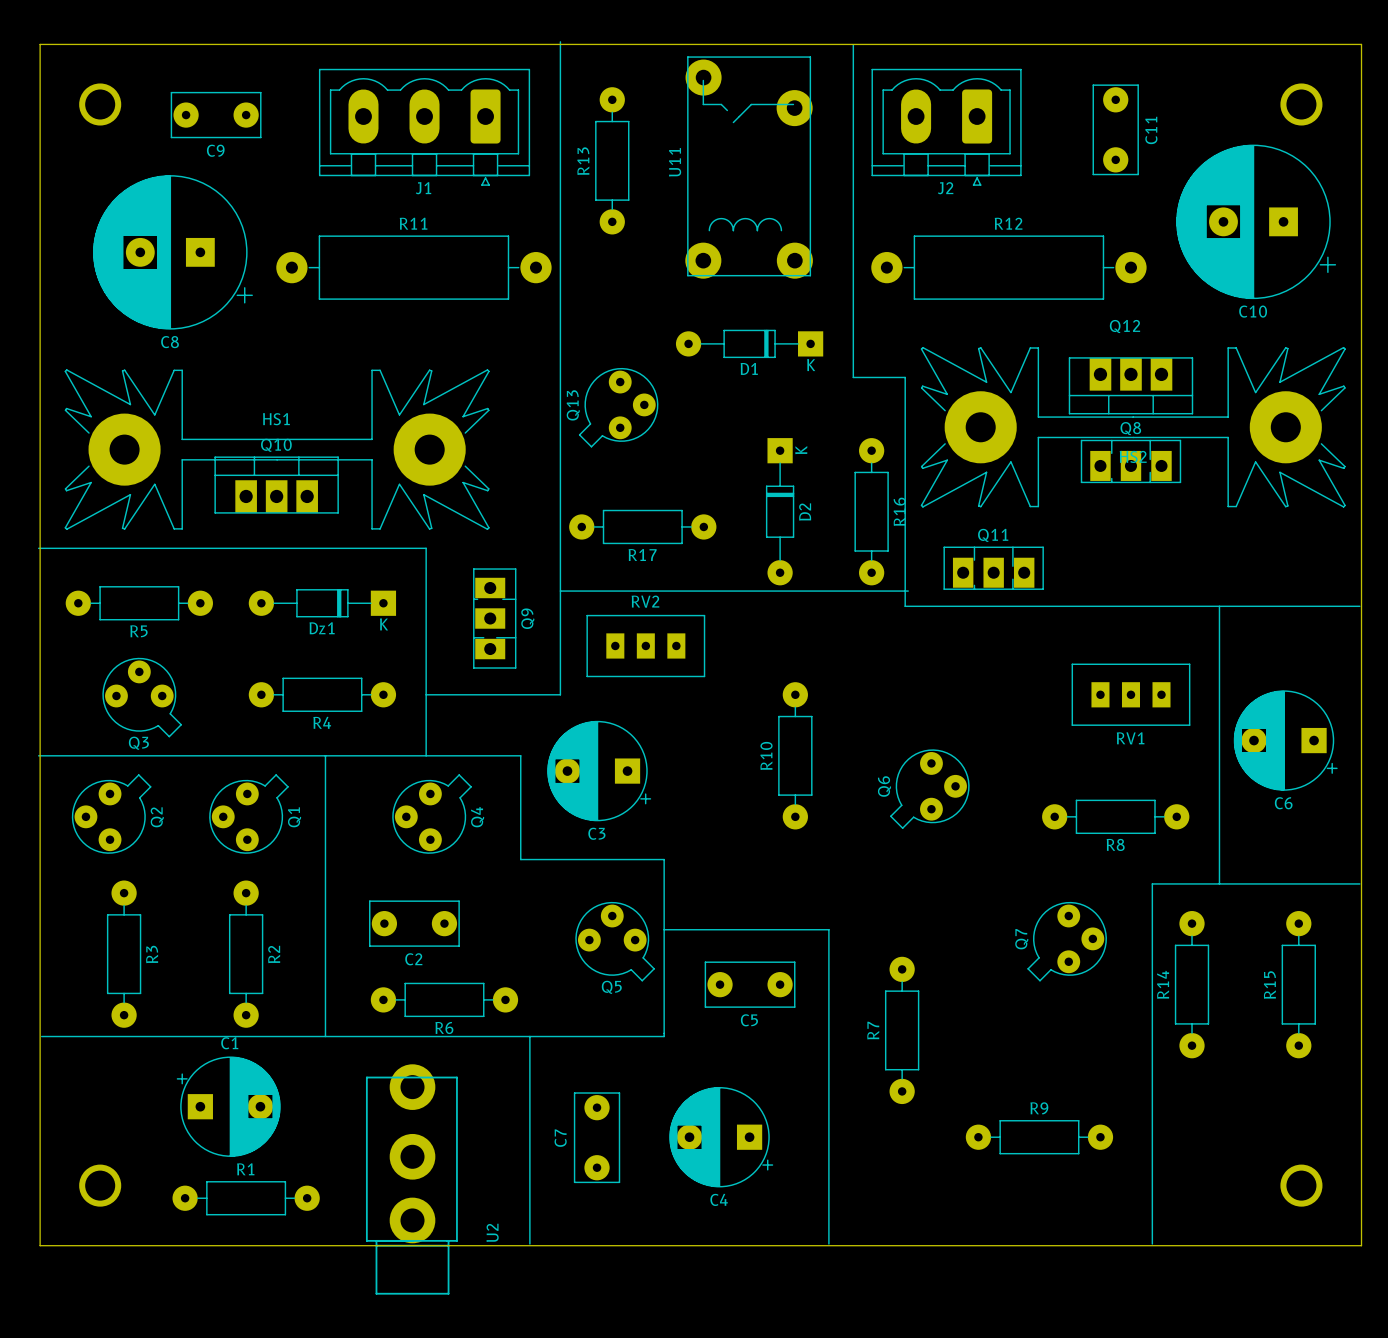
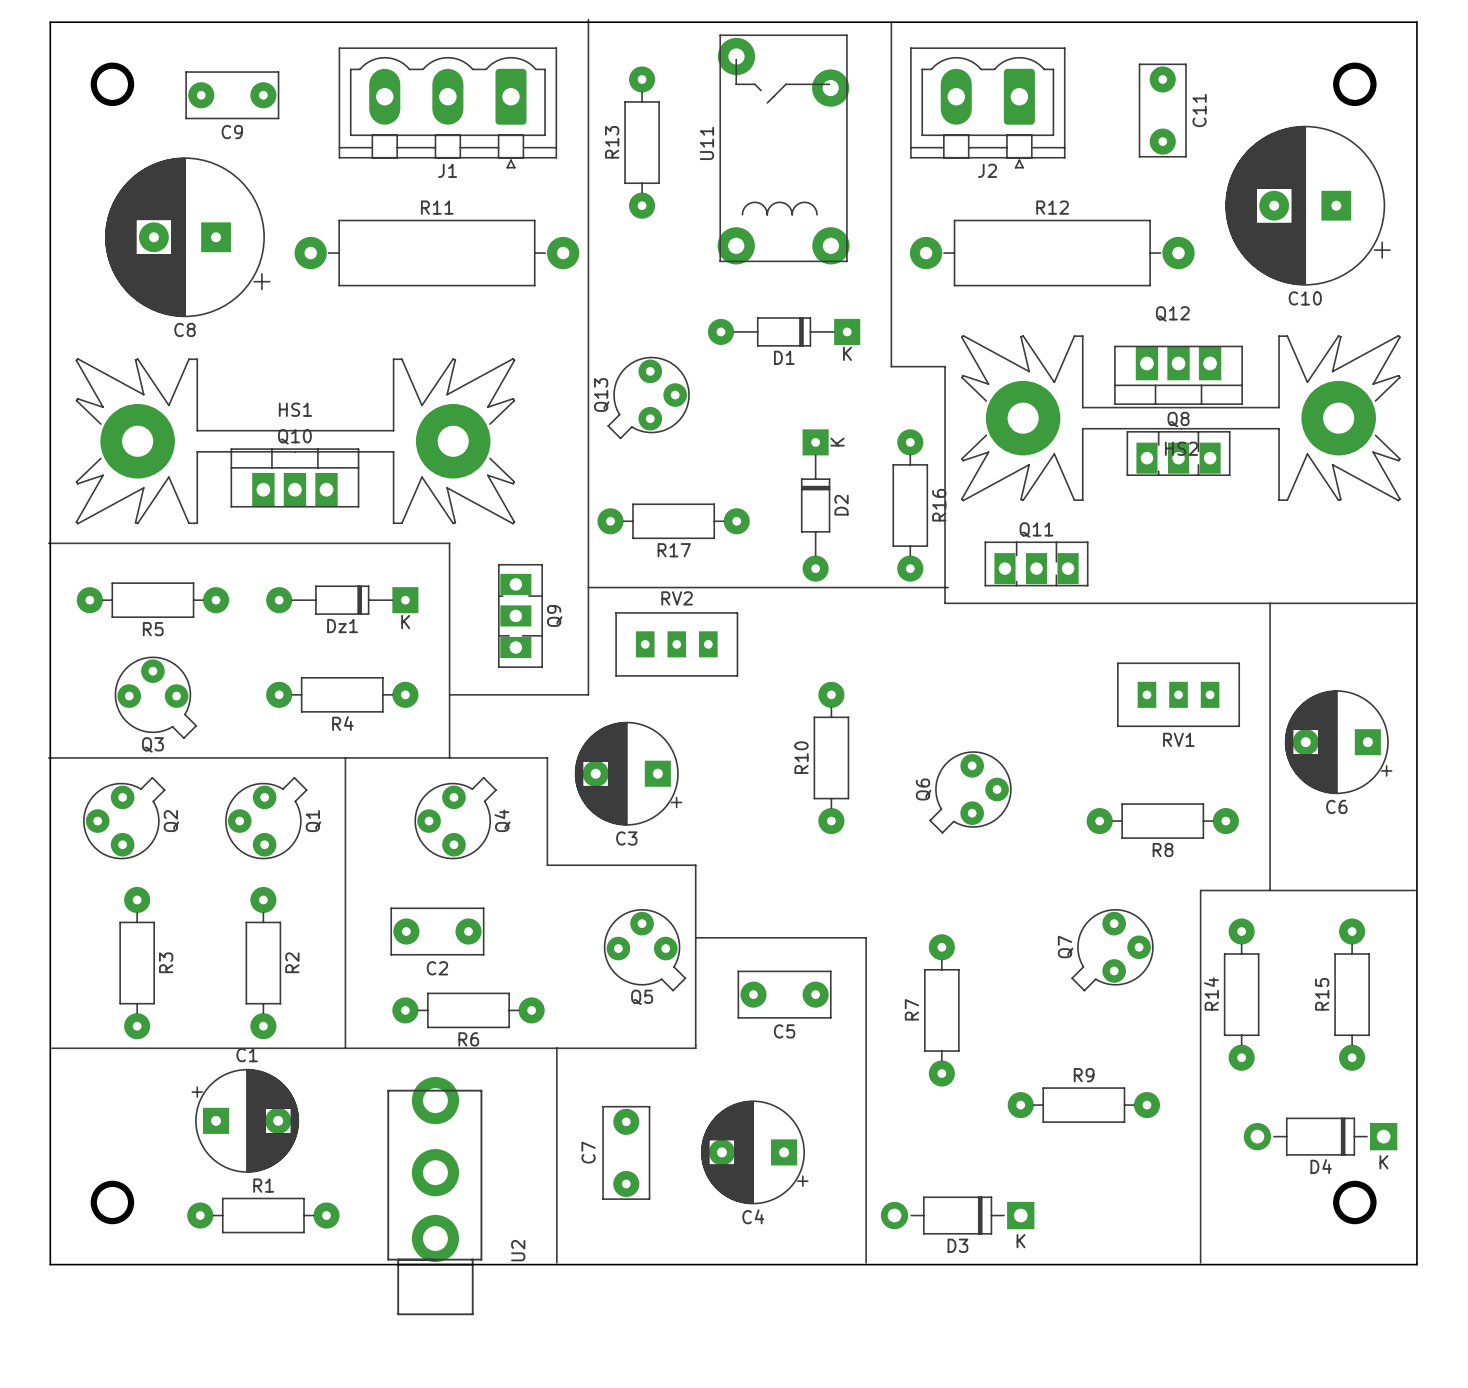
R7 position: (902, 1030) -> (941, 1010)
D4: none -> (1320, 1136)
R9 position: (1039, 1137) -> (1083, 1105)
D3: none -> (957, 1215)

